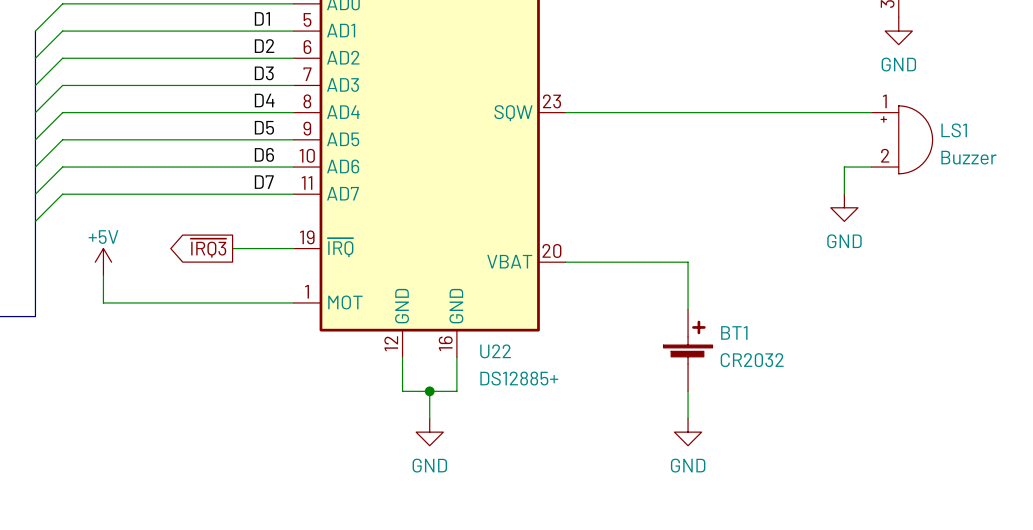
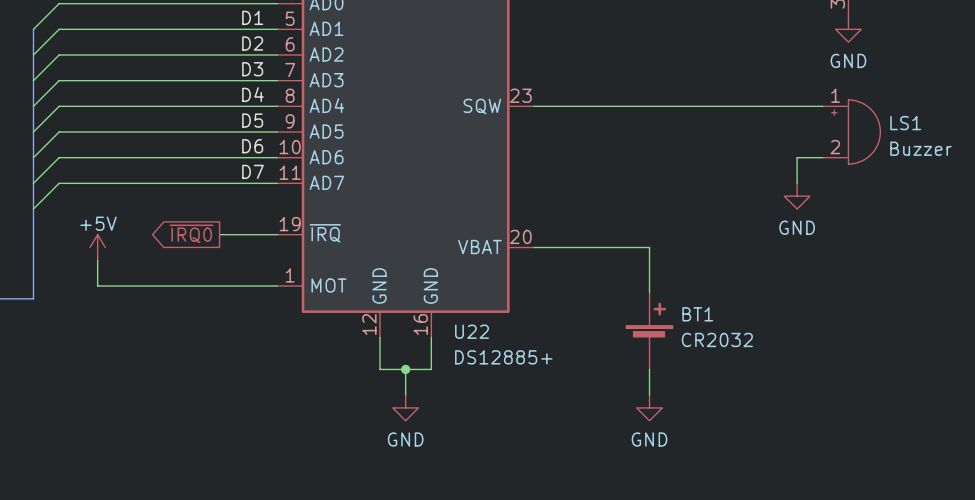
global label: ~{IRQ3} (208, 248) -> ~{IRQ0} (191, 233)

